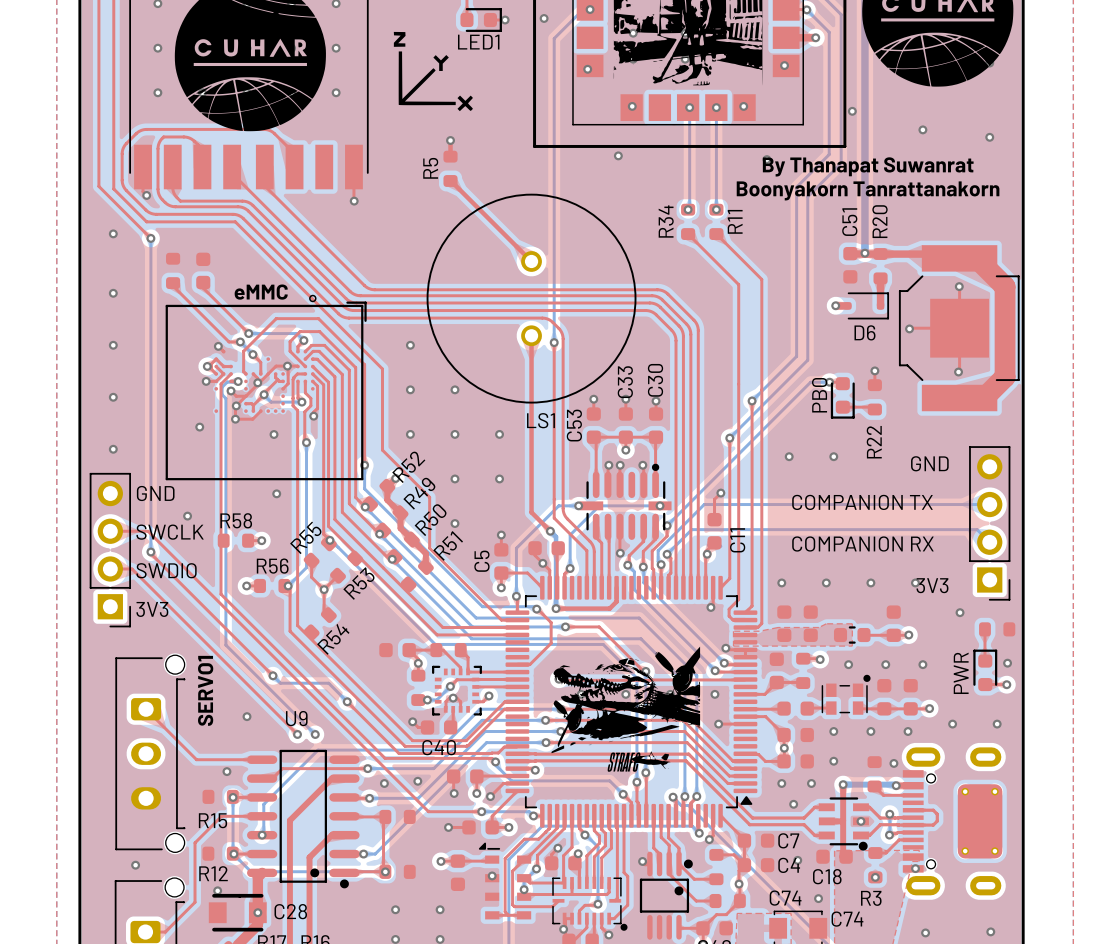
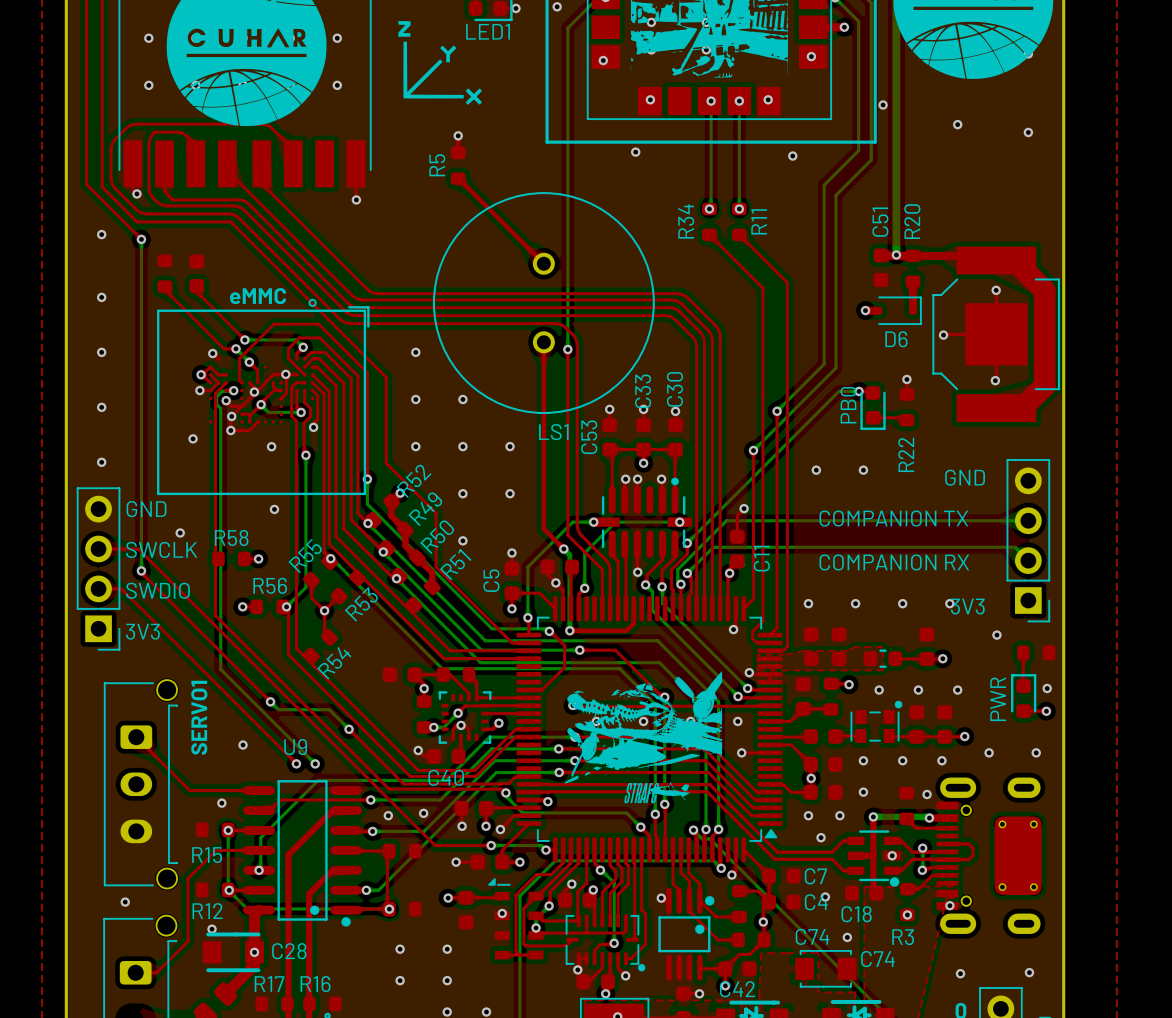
text: By Thanapat Suwanrat (868, 166) -> none
text: Boonyakorn Tanrattanakorn (868, 190) -> none

